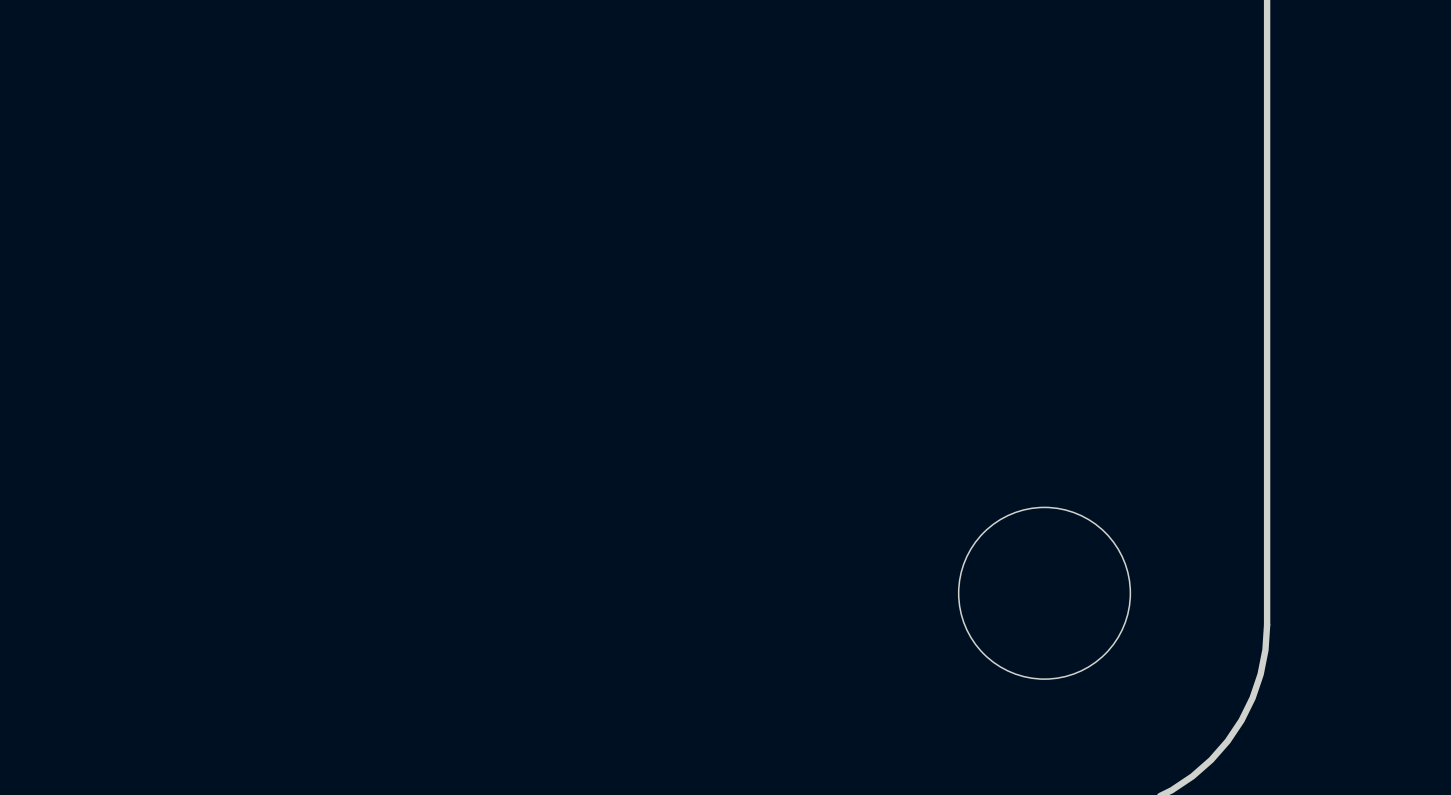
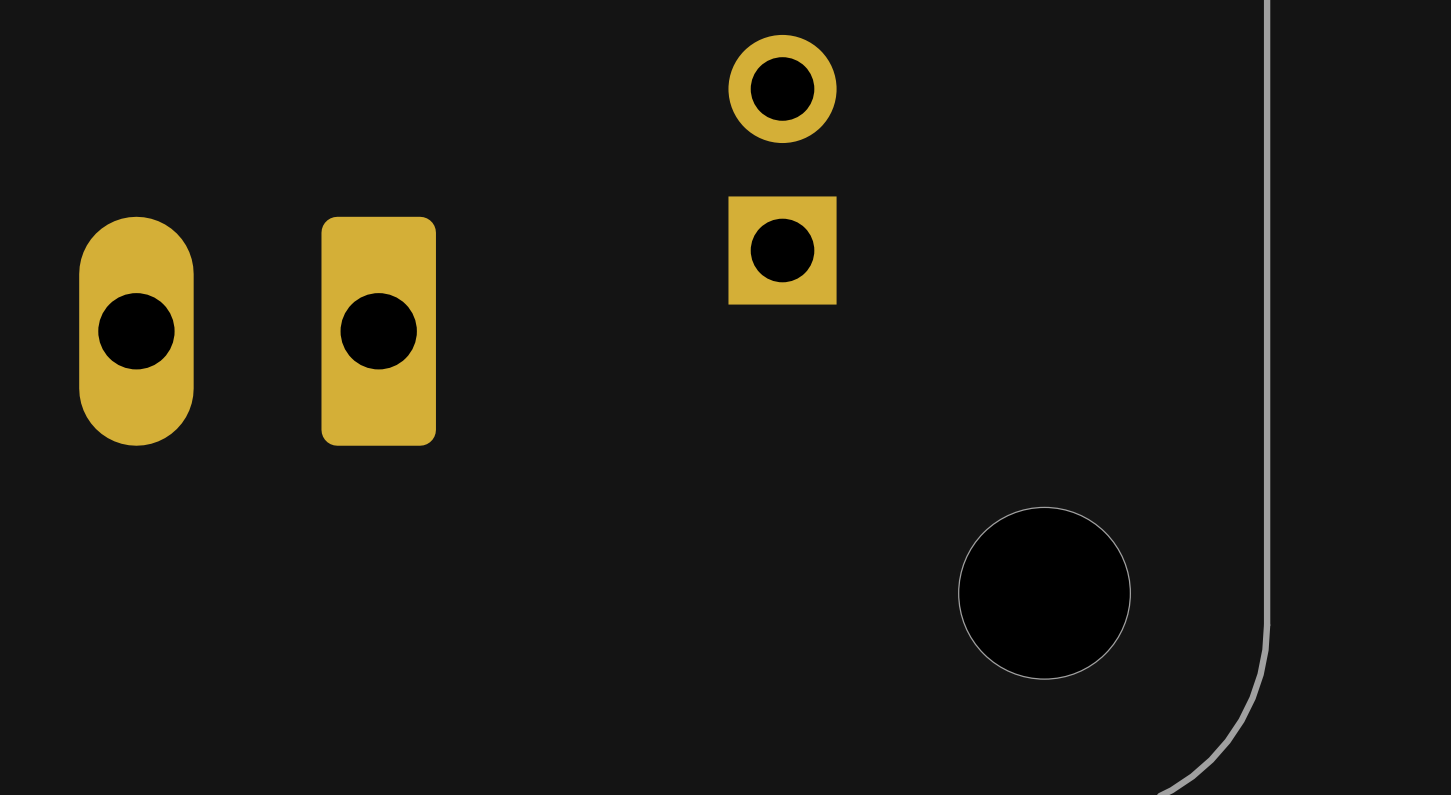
part: none -> (782, 169)
part: none -> (257, 331)

